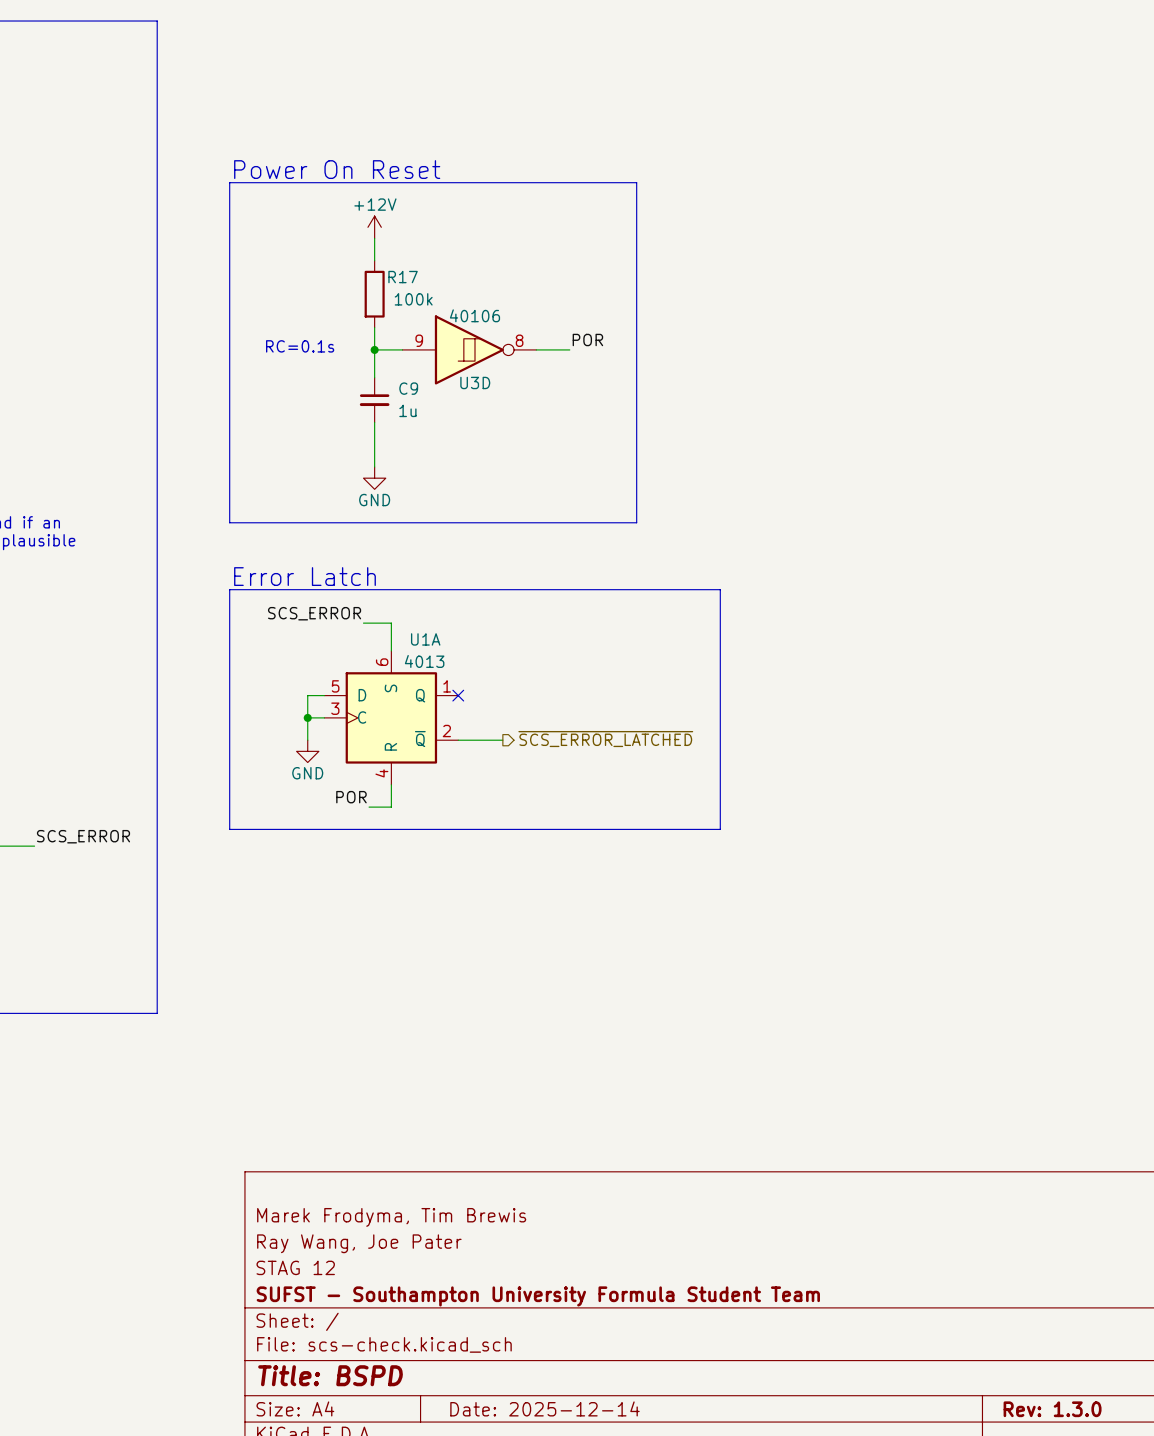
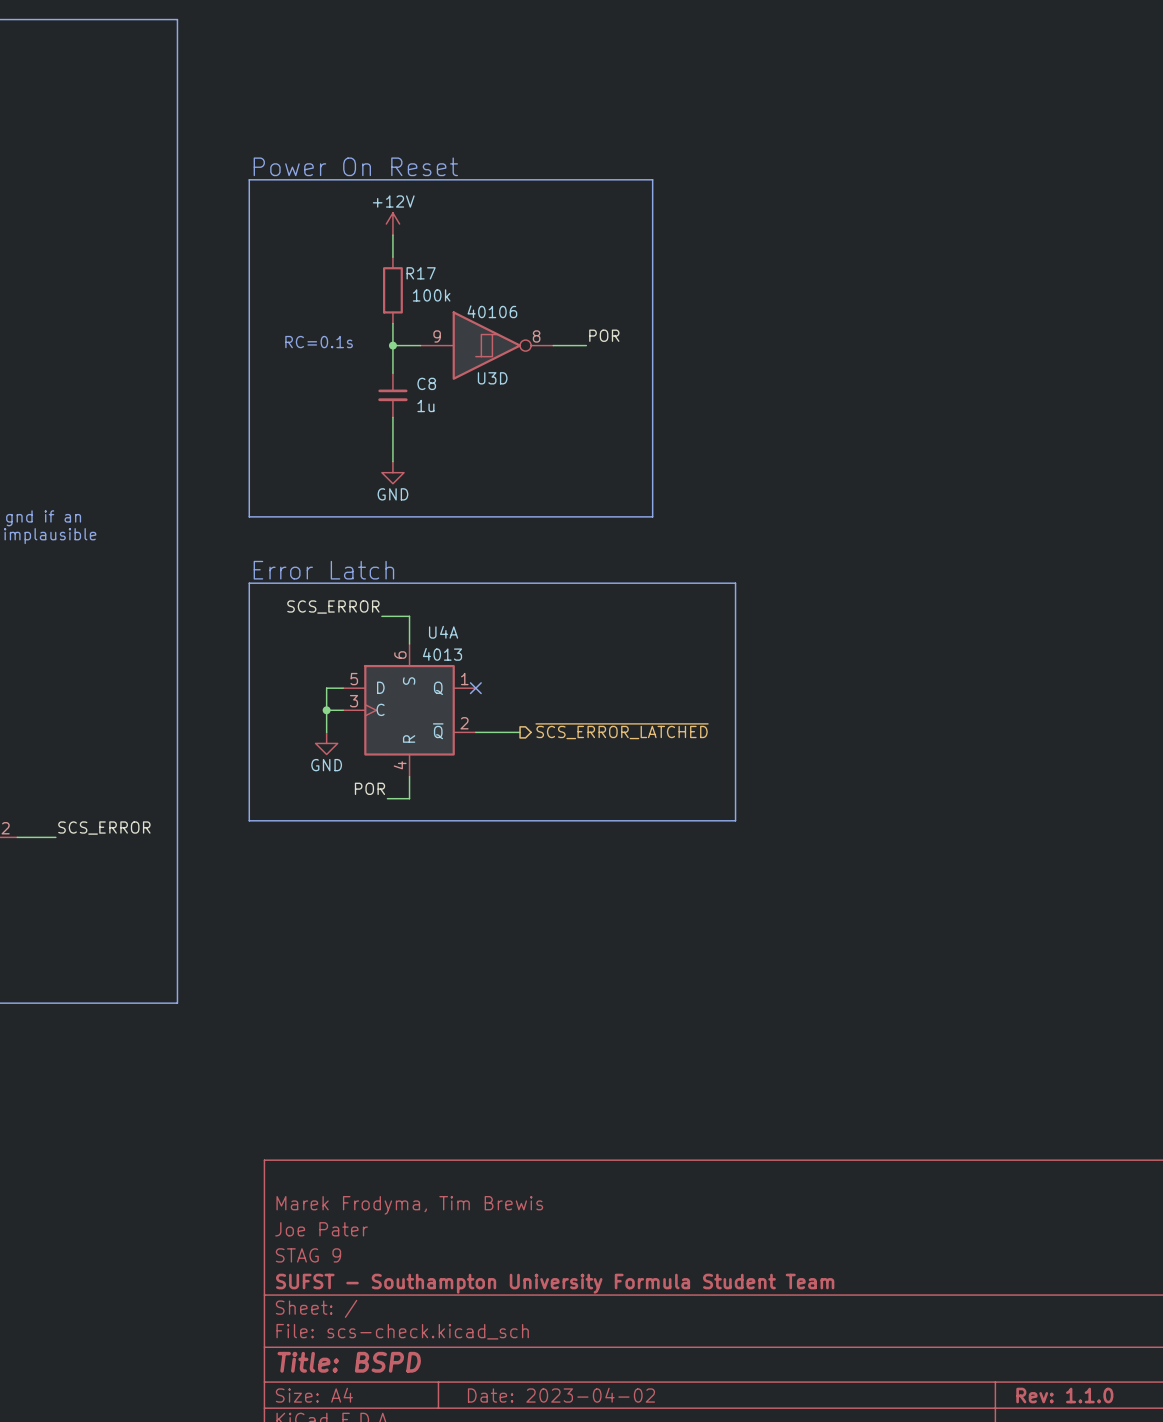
C9 name: C9 (408, 388) -> C8 (426, 383)
U1A name: U1A (425, 639) -> U4A (443, 632)
title block: Ray Wang, Joe Pater (359, 1243) -> Joe Pater (321, 1229)
title block: STAG 12 (295, 1267) -> STAG 9 (308, 1255)
title block: Date: 2025-12-14 (544, 1408) -> Date: 2023-04-02 (561, 1395)
title block: Rev: 1.3.0 (1052, 1409) -> Rev: 1.1.0 (1064, 1395)

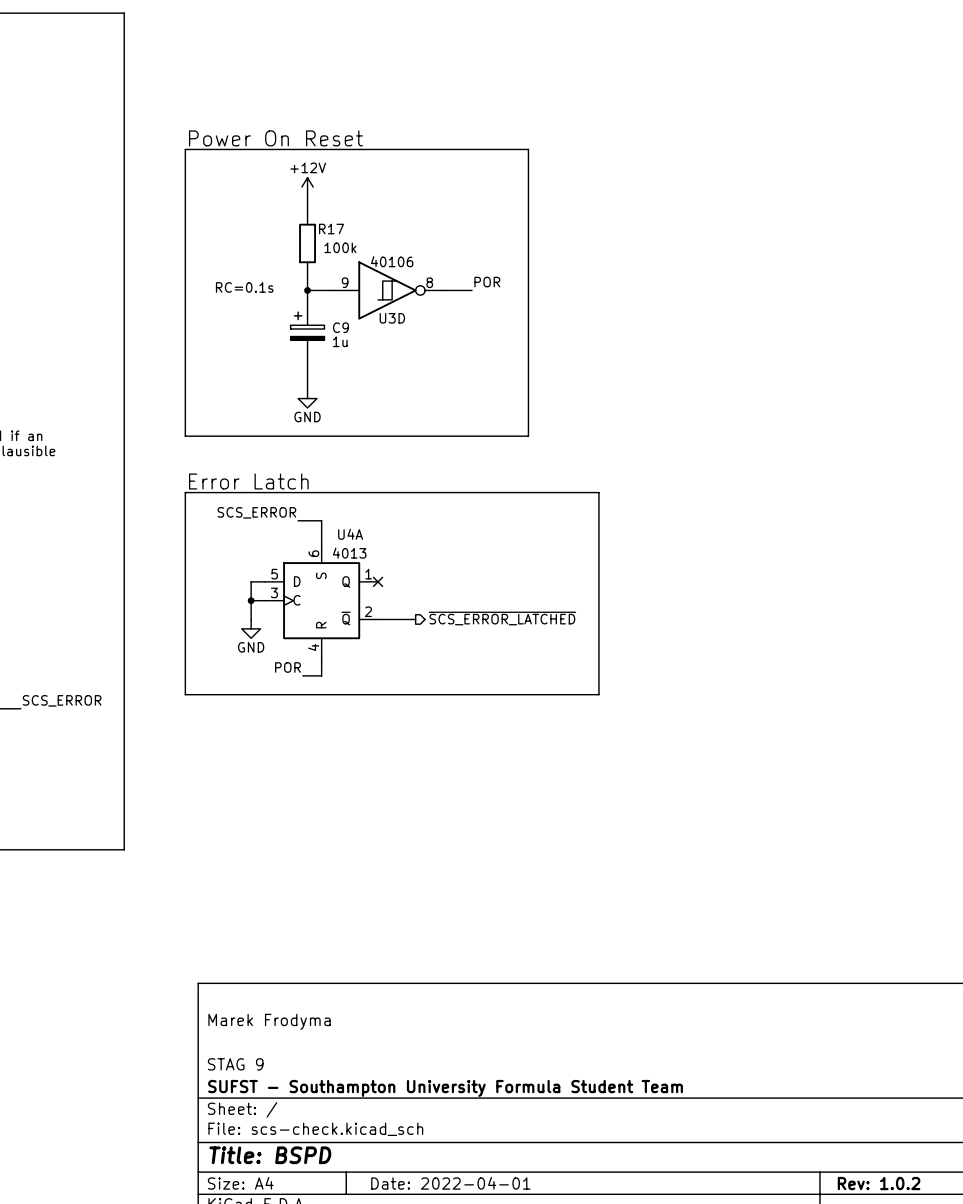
C8: 1u (392, 395) -> none
C9: none -> 1u (307, 332)
title block: Marek Frodyma, Tim Brewis (409, 1205) -> Marek Frodyma (269, 1021)
title block: Joe Pater (321, 1229) -> none
title block: Date: 2023-04-02 (561, 1395) -> Date: 2022-04-01 (450, 1183)
title block: Rev: 1.1.0 (1064, 1395) -> Rev: 1.0.2 (879, 1183)

